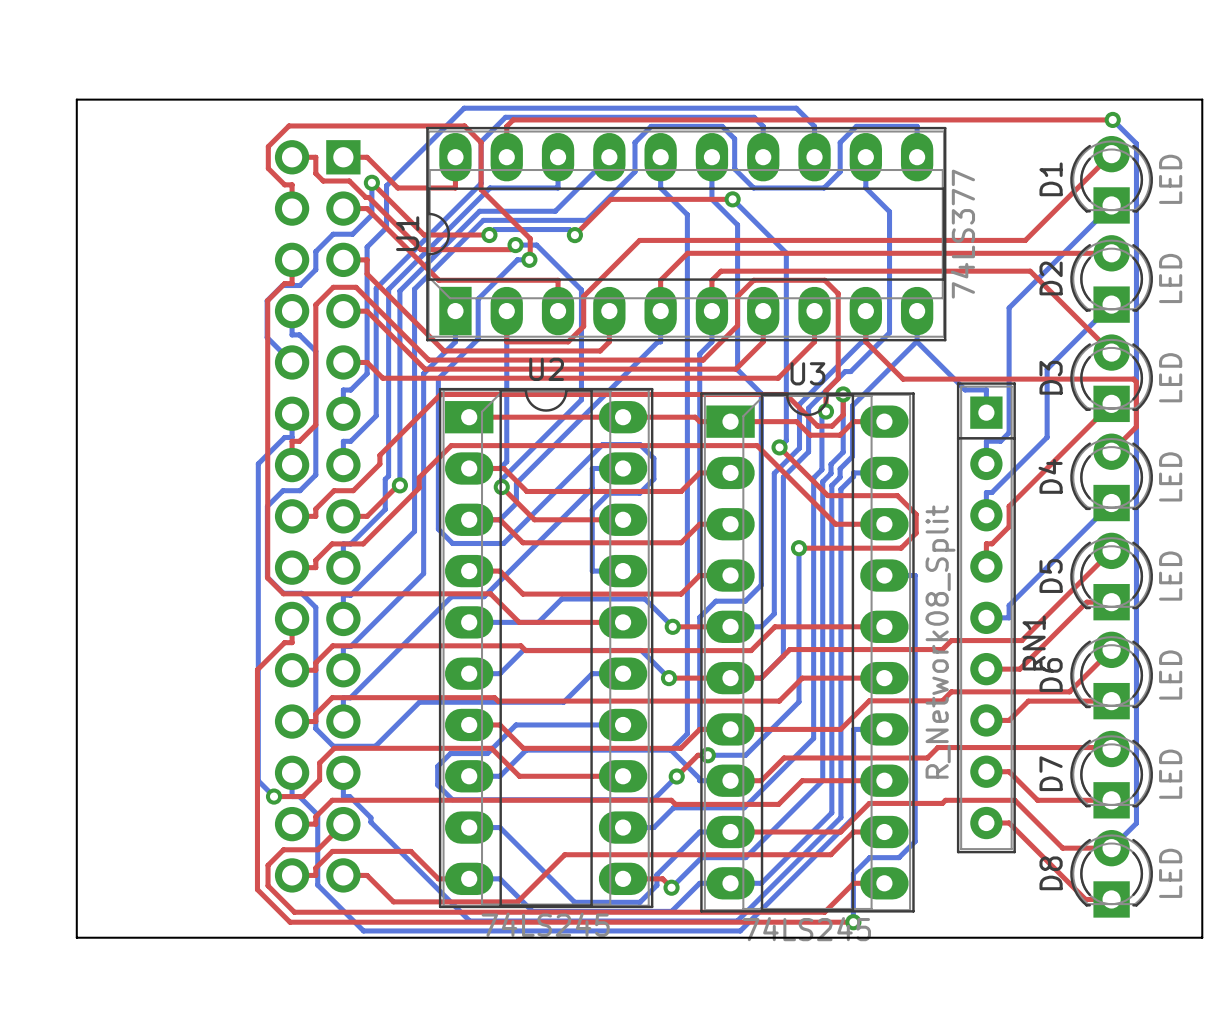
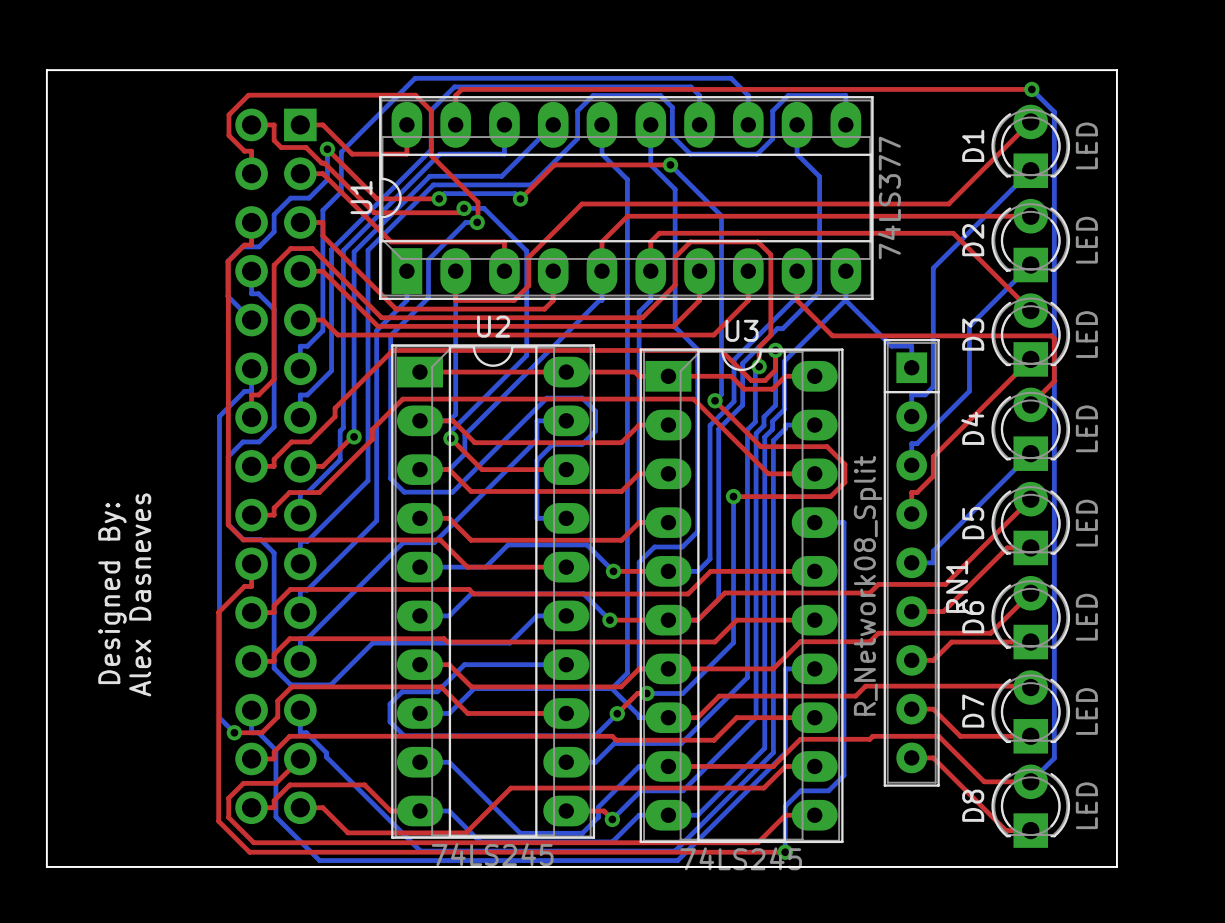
text: none -> Designed By: (112, 593)
text: none -> Alex Dasneves (140, 594)

